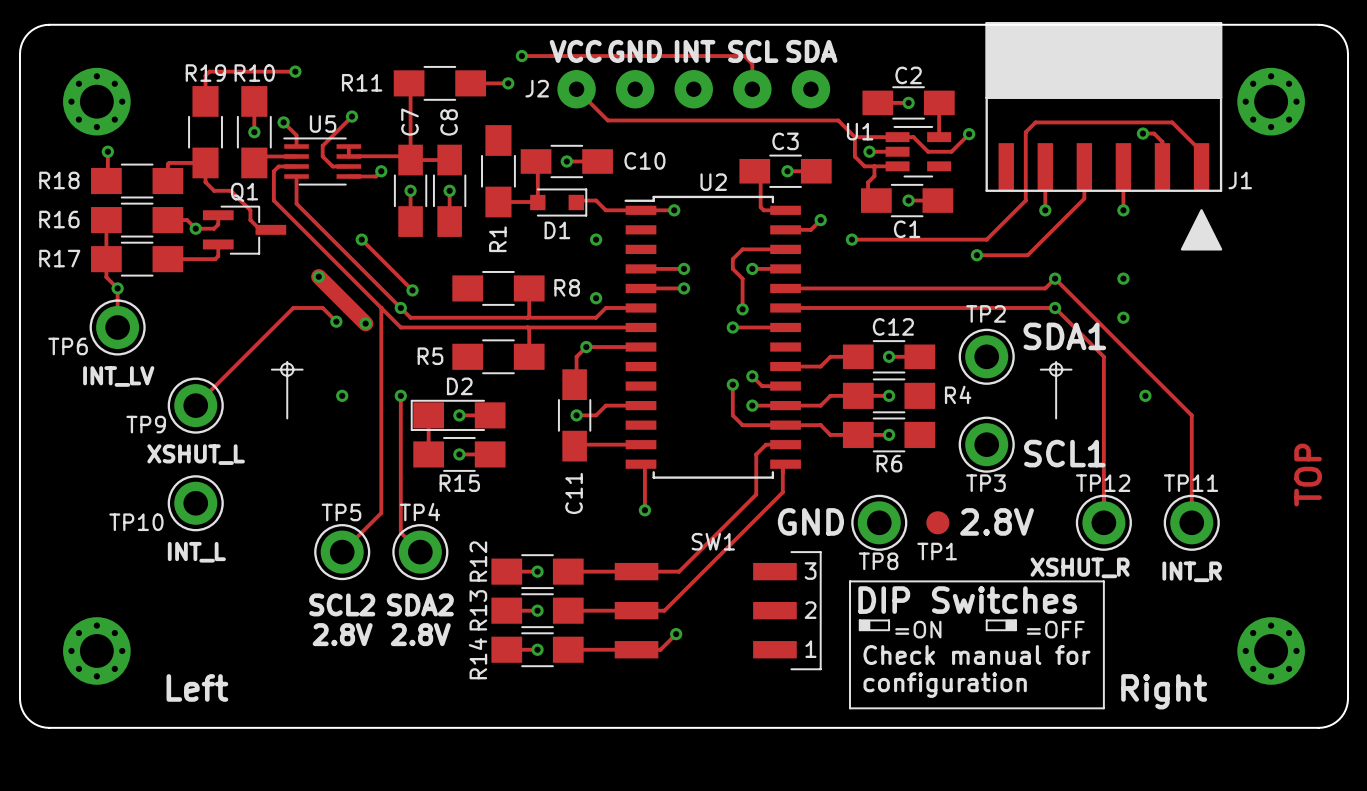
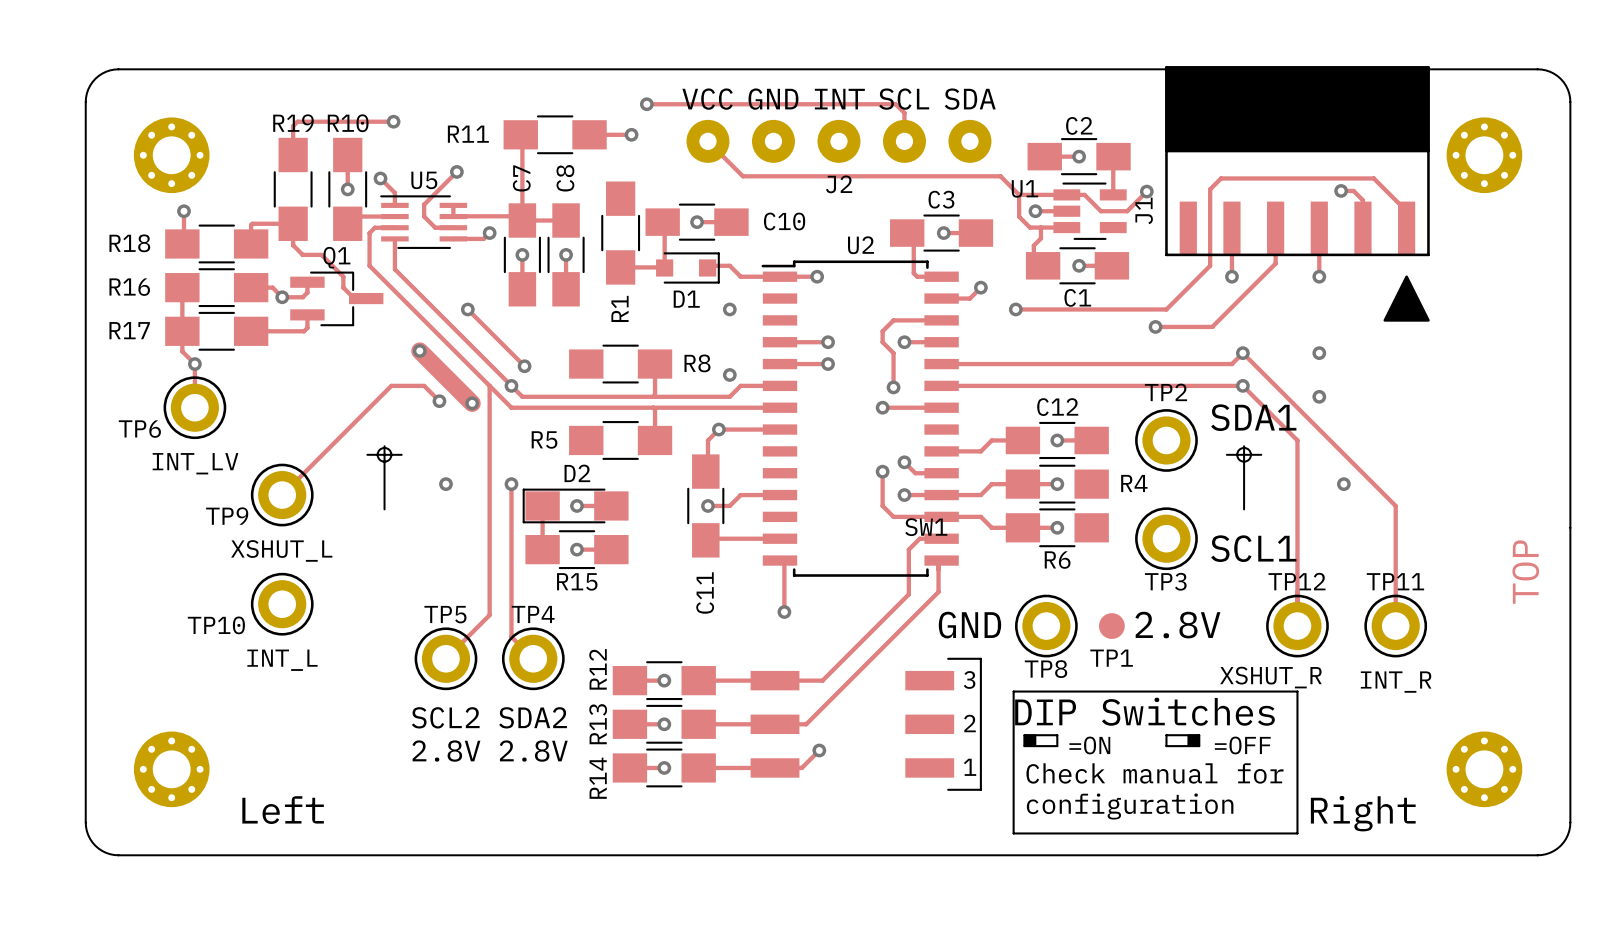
J2 name position: J2 (537, 88) -> J2 (839, 184)
J1 name rotation: 0° (1240, 180) -> 90° counterclockwise (1144, 210)
J1 name position: J1 (1240, 180) -> J1 (1144, 210)
SW1 name position: SW1 (713, 541) -> SW1 (926, 527)

